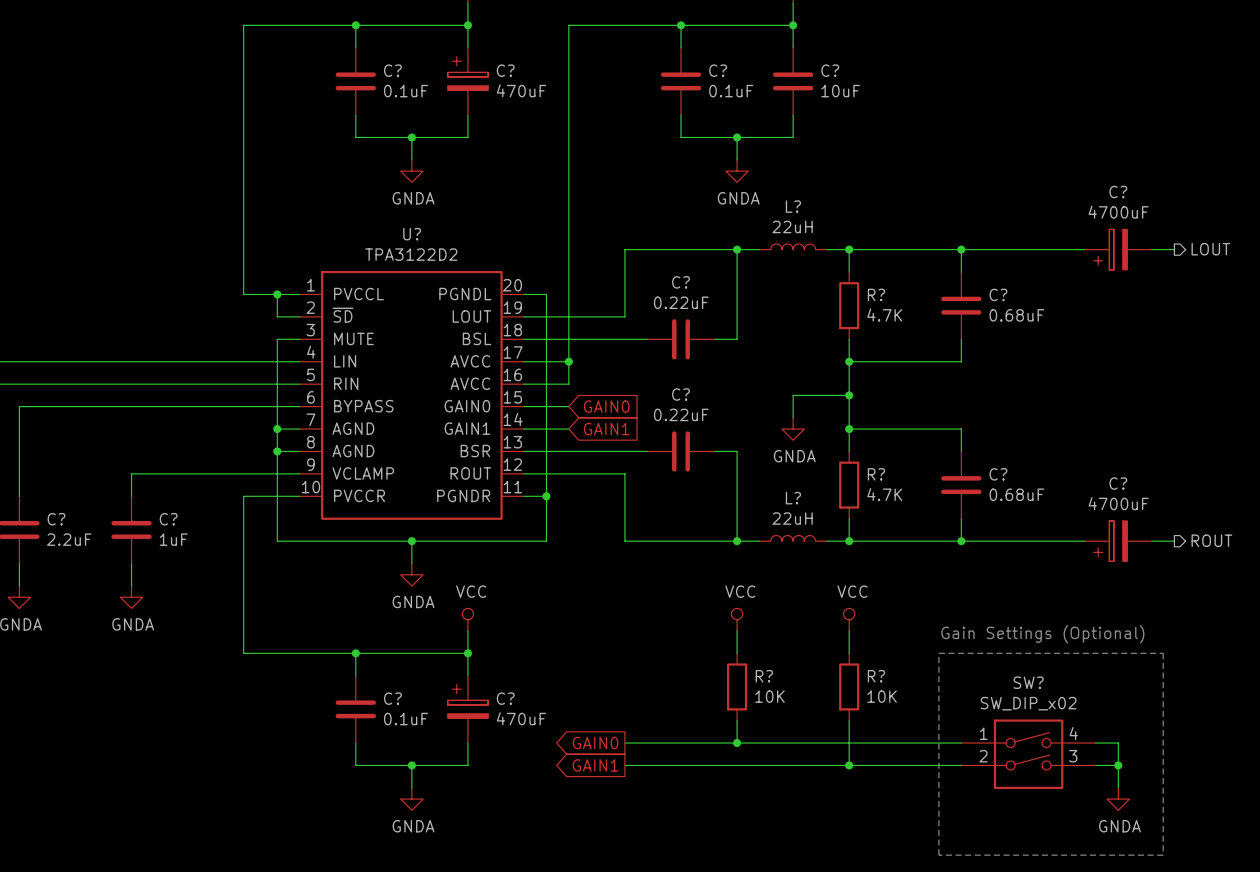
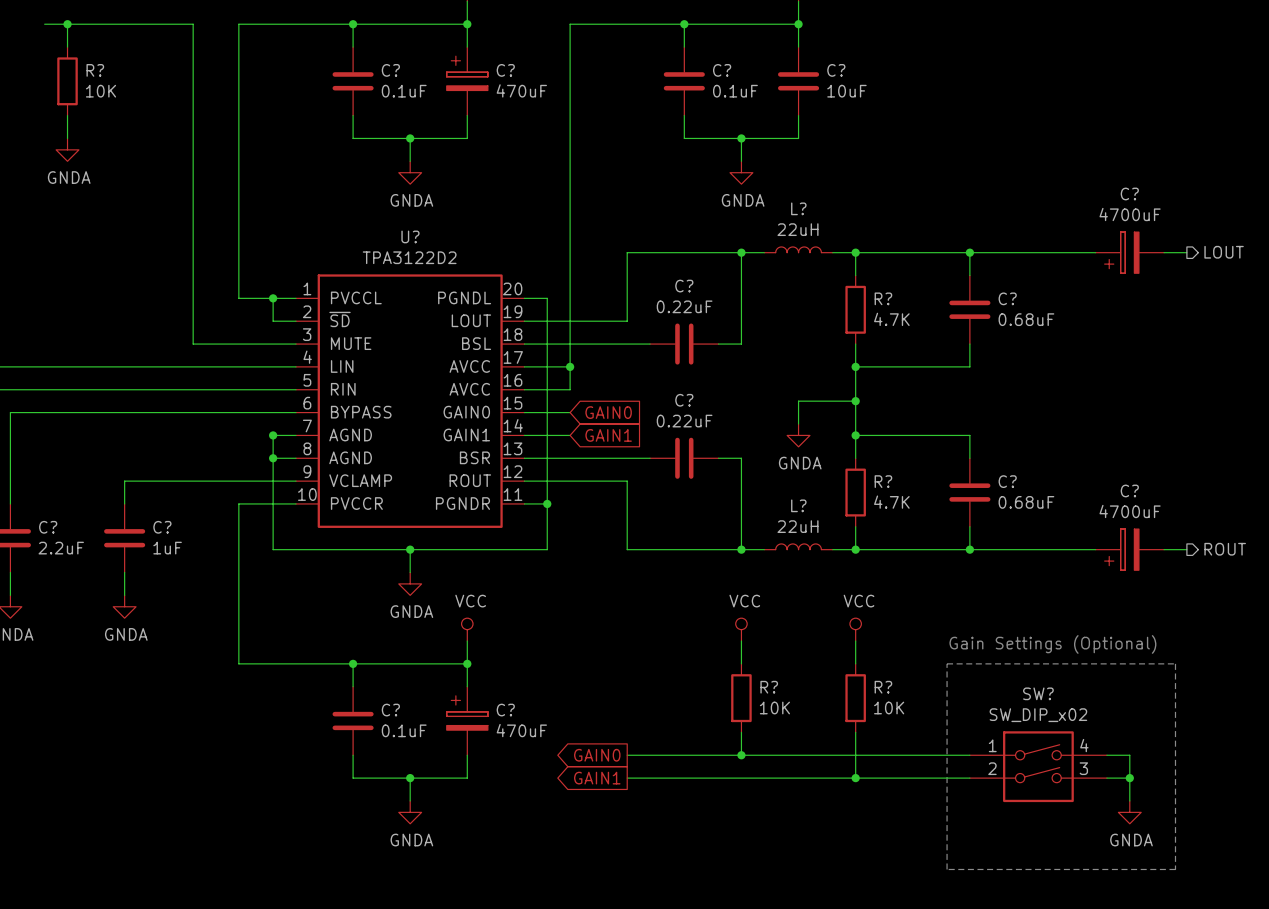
wire: none -> (67, 24) (67, 47)
junction: none -> (67, 24)
R?: none -> 10K (67, 81)
wire: none -> (67, 115) (67, 138)
power symbol: none -> GNDA (67, 149)
wire: (277, 339) (277, 429) -> (273, 344) (193, 344) (193, 24) (44, 24)

